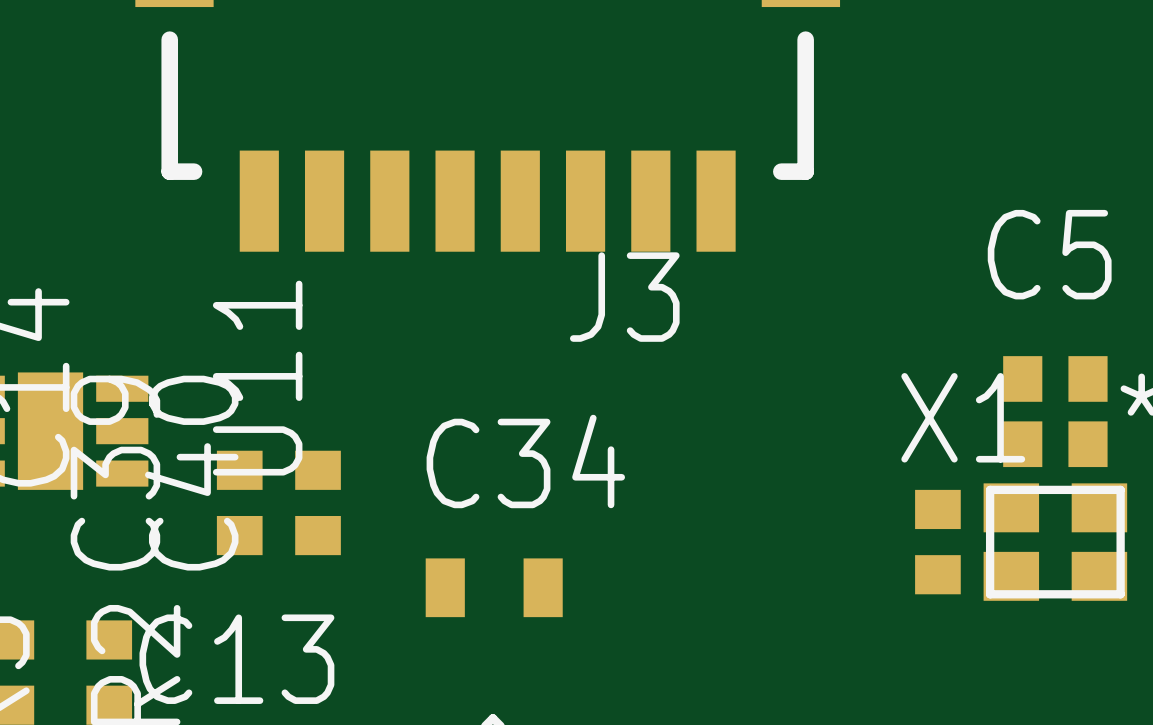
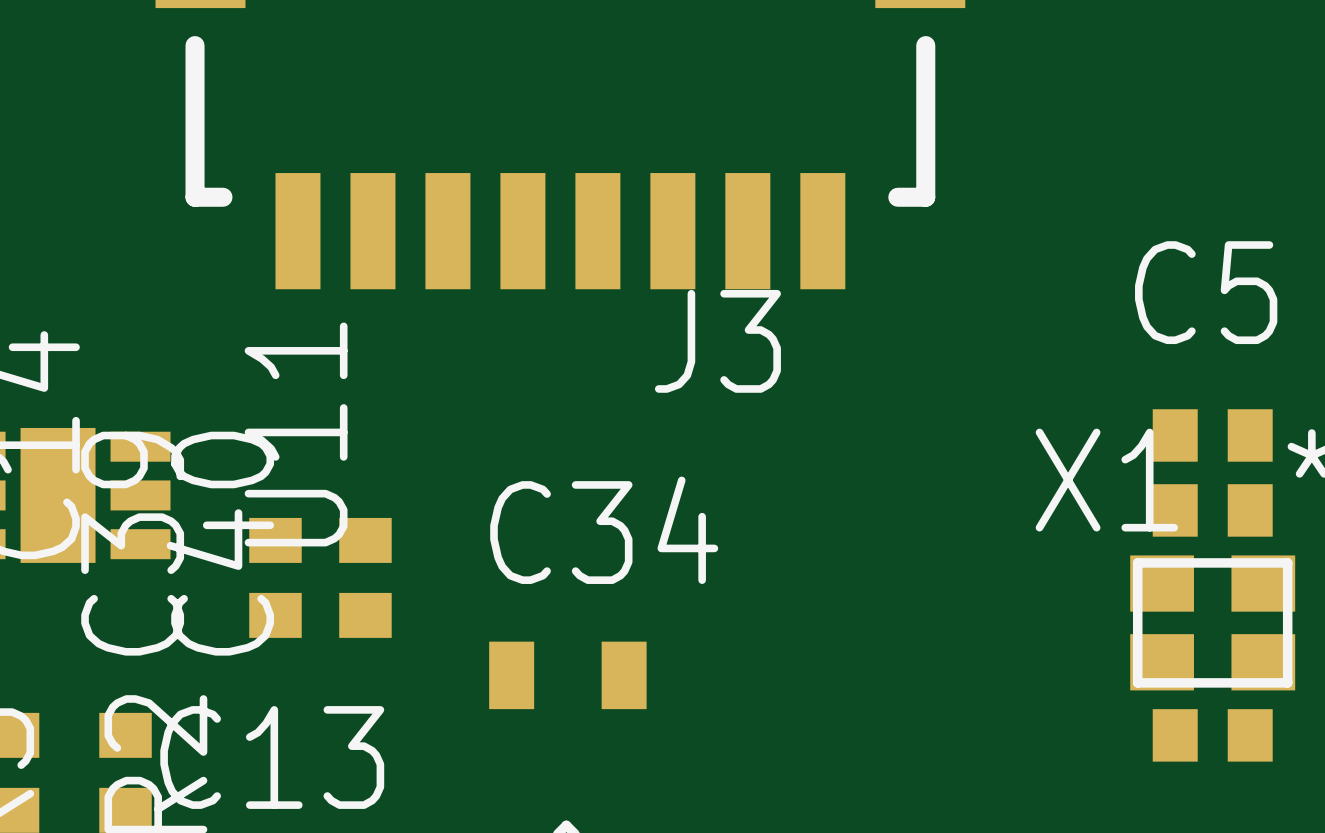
part rotation: 0° (937, 542) -> 90° clockwise (1212, 735)
part position: (937, 542) -> (1212, 735)

